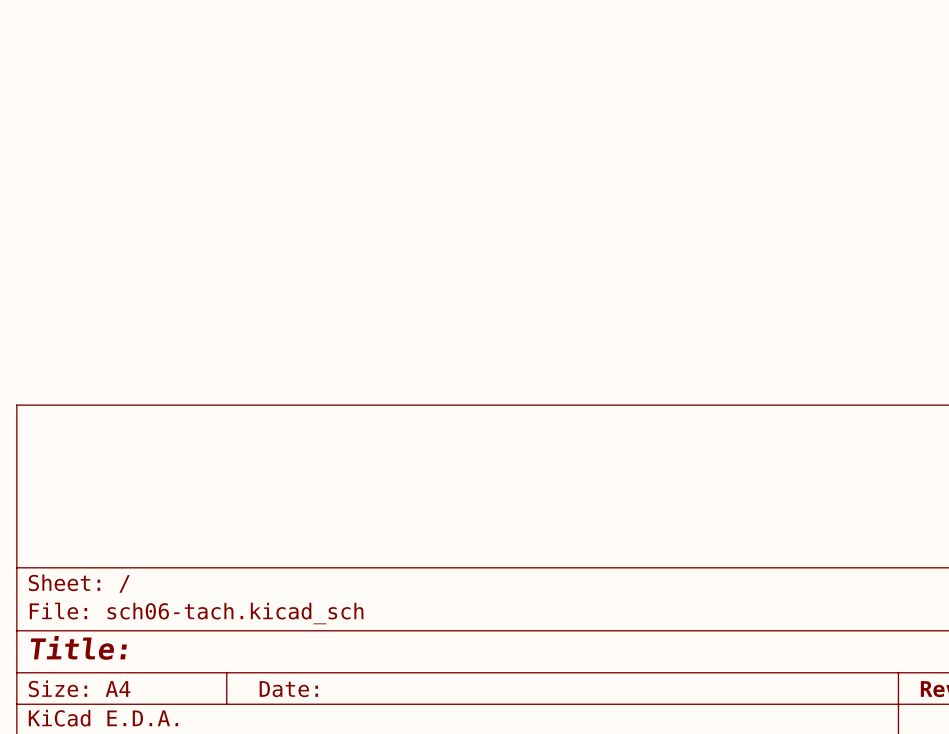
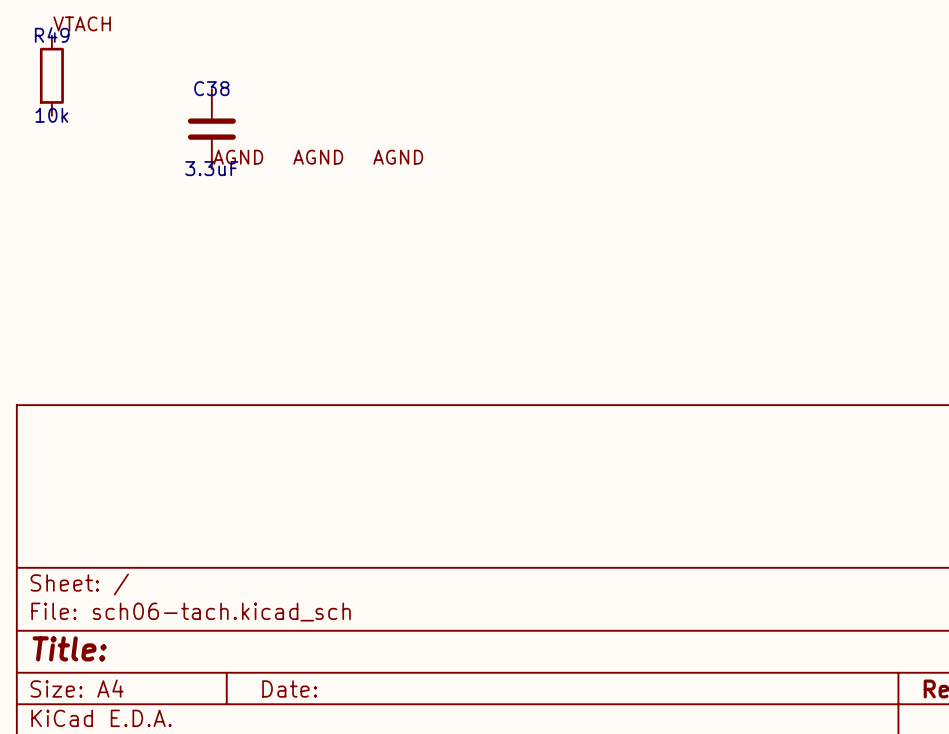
label: none -> VTACH (82, 23)
R49: none -> 10k (51, 75)
C38: none -> 3.3uF (211, 129)
label: none -> AGND (238, 157)
label: none -> AGND (318, 157)
label: none -> AGND (398, 157)

